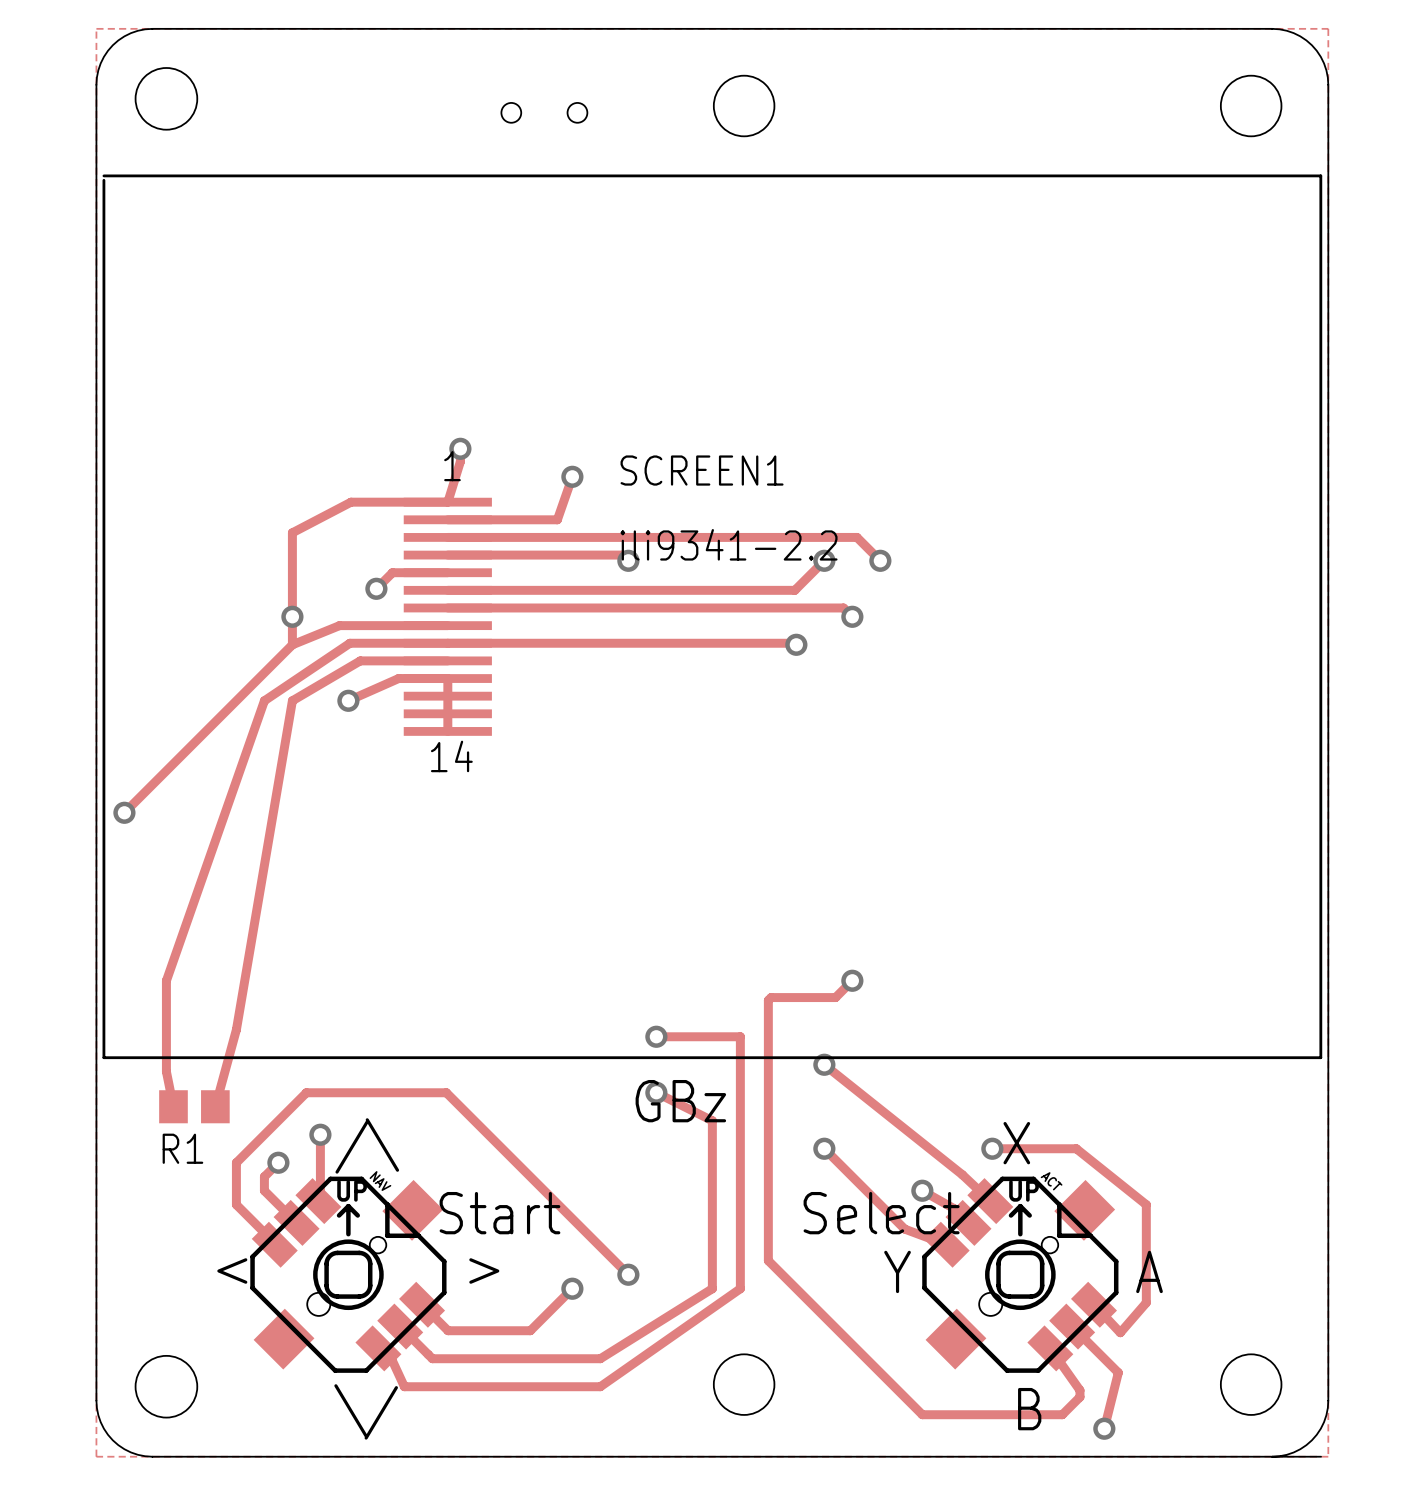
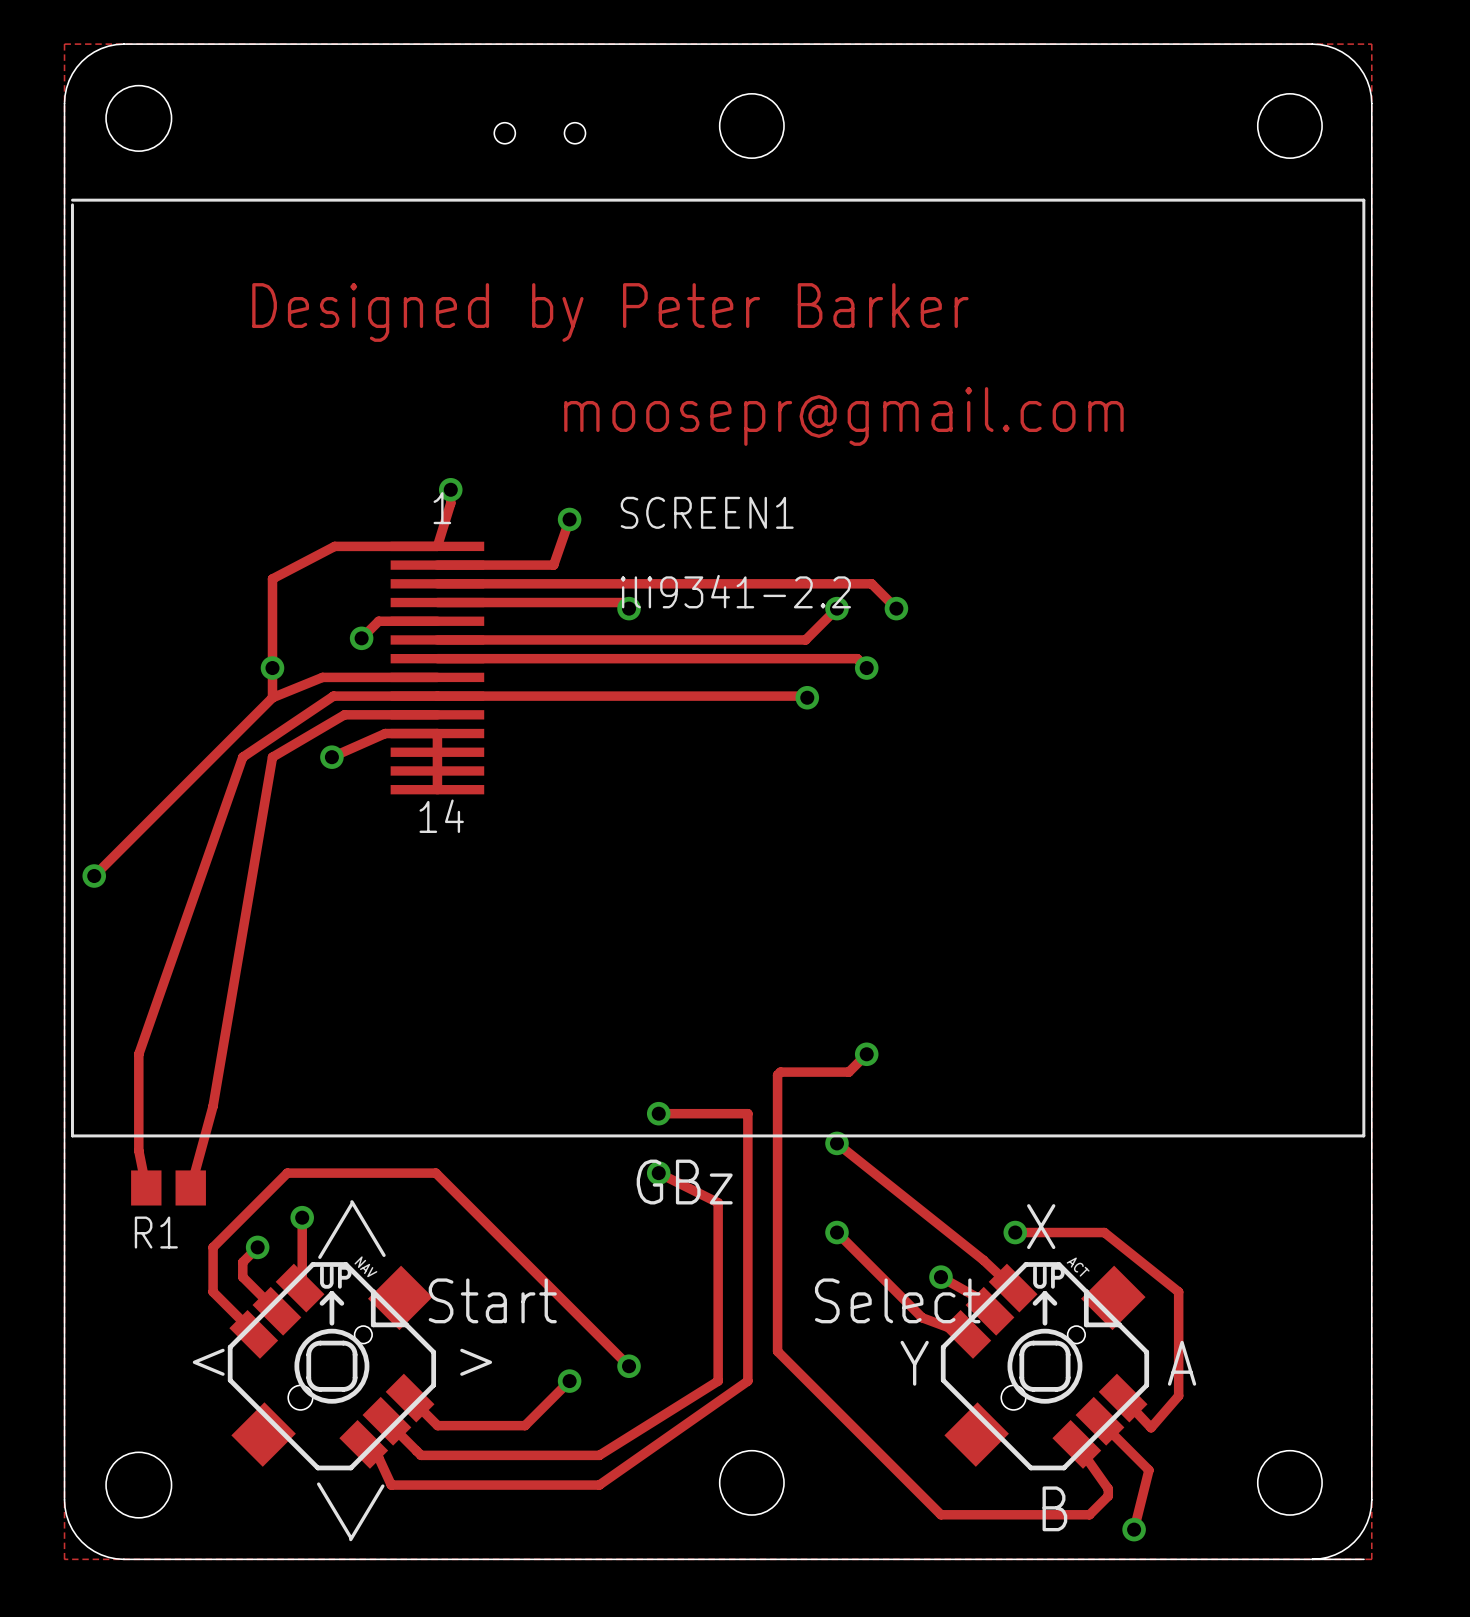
text: none -> Designed by Peter Barker (610, 312)
text: none -> moosepr@gmail.com (843, 416)

